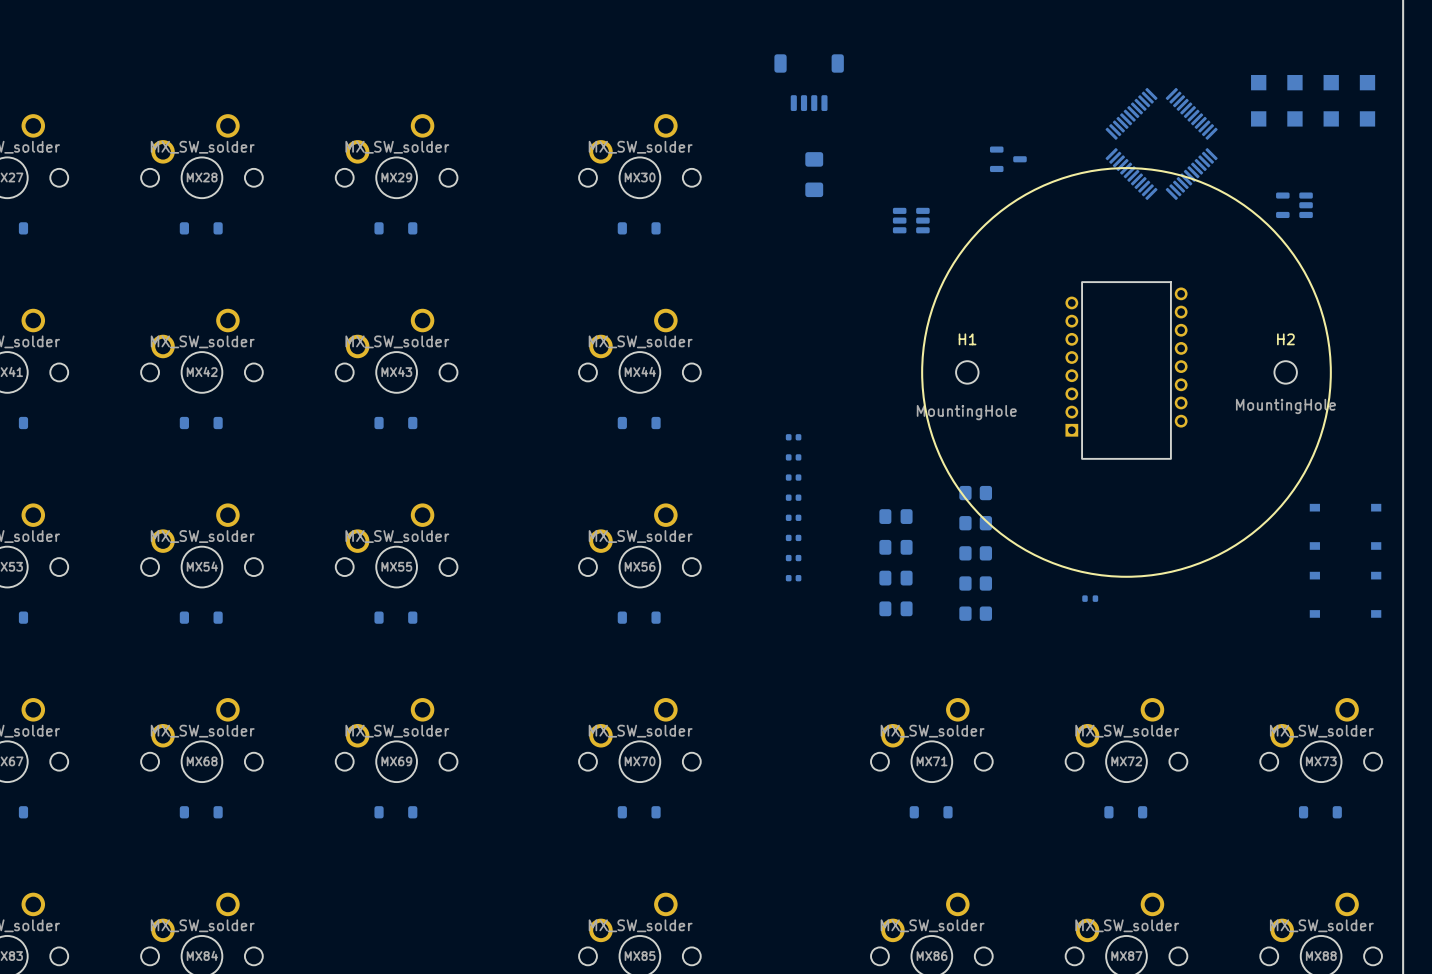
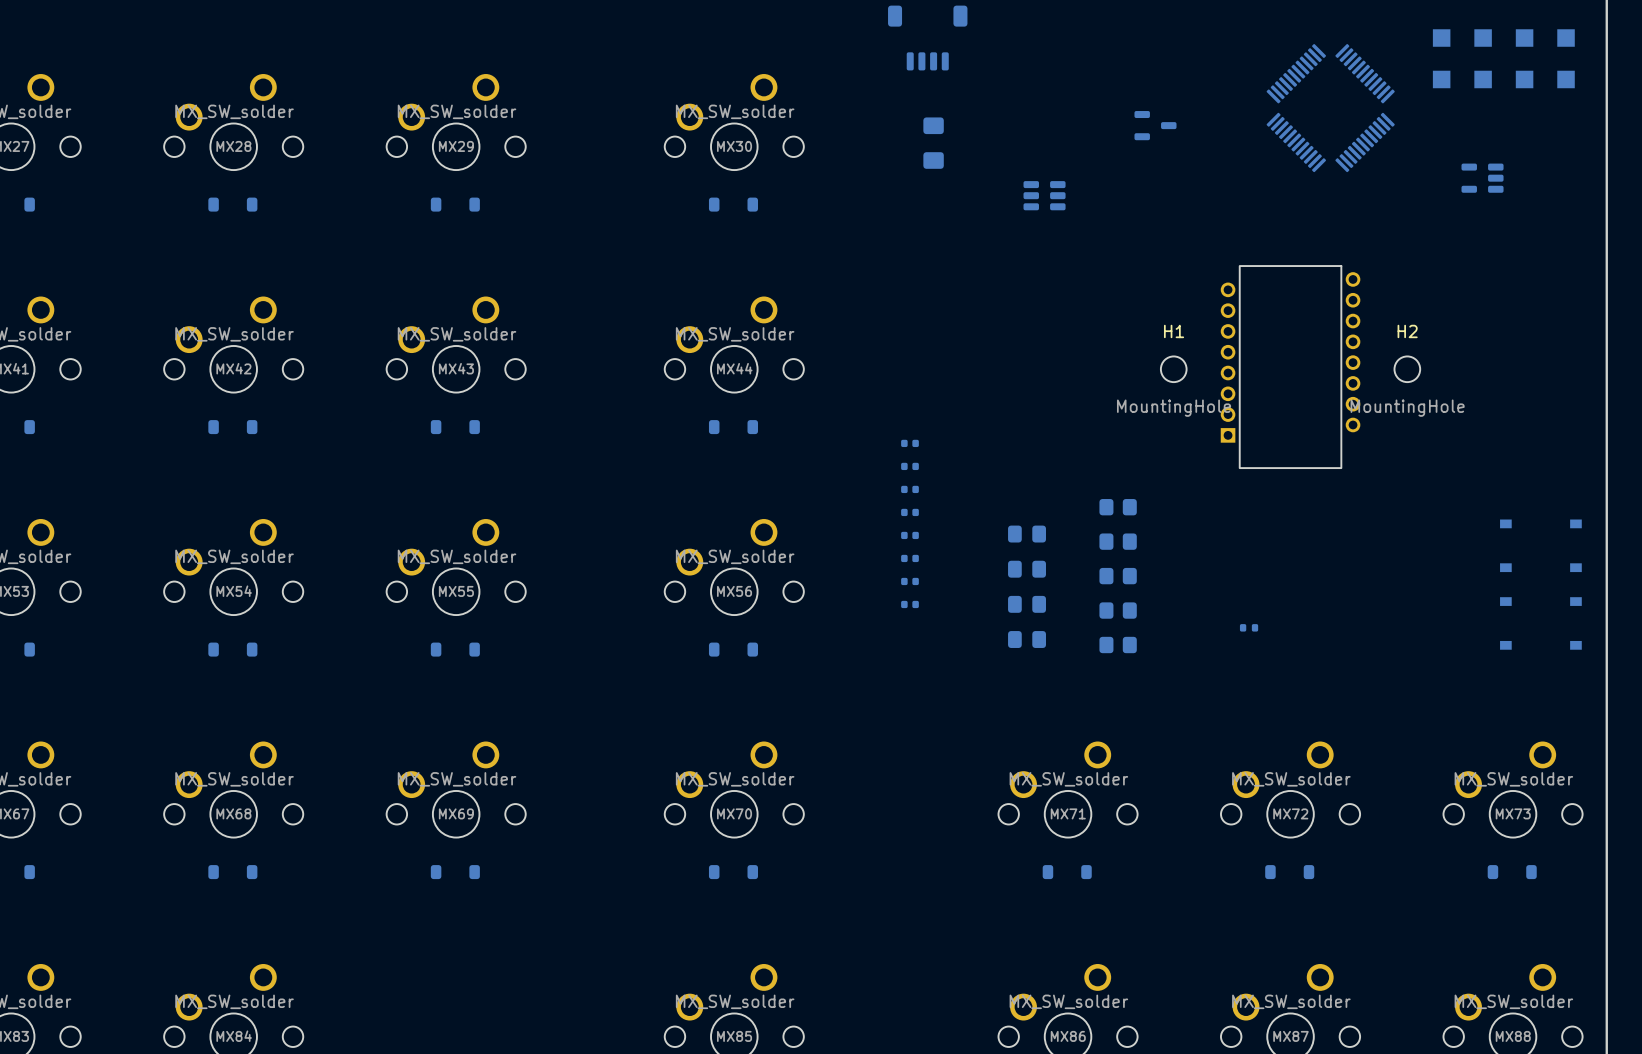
drawing: [921, 167, 1332, 578] -> none
H1 position: (967, 372) -> (1173, 369)
H2 position: (1285, 372) -> (1407, 369)
H1 value position: MountingHole (966, 412) -> MountingHole (1174, 408)

